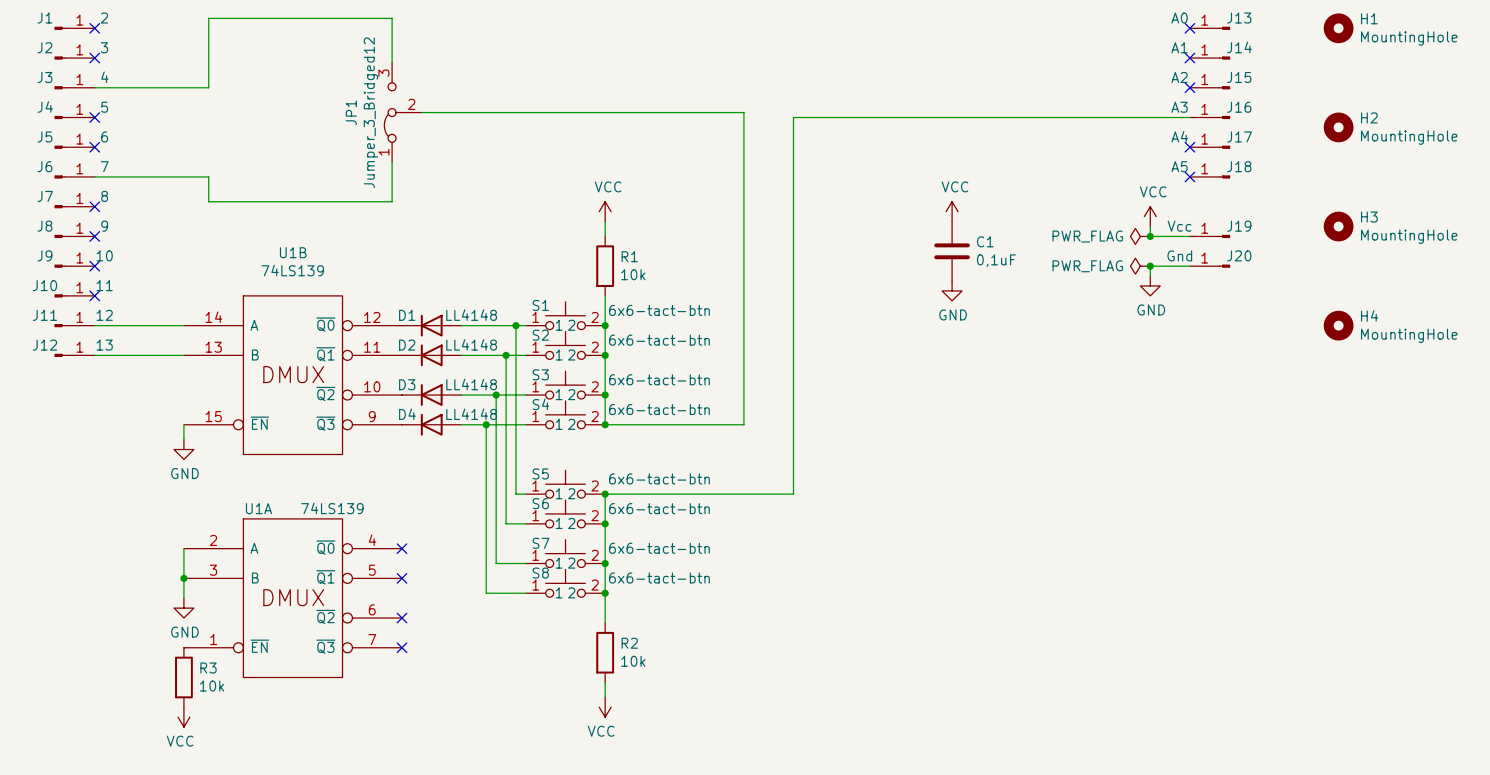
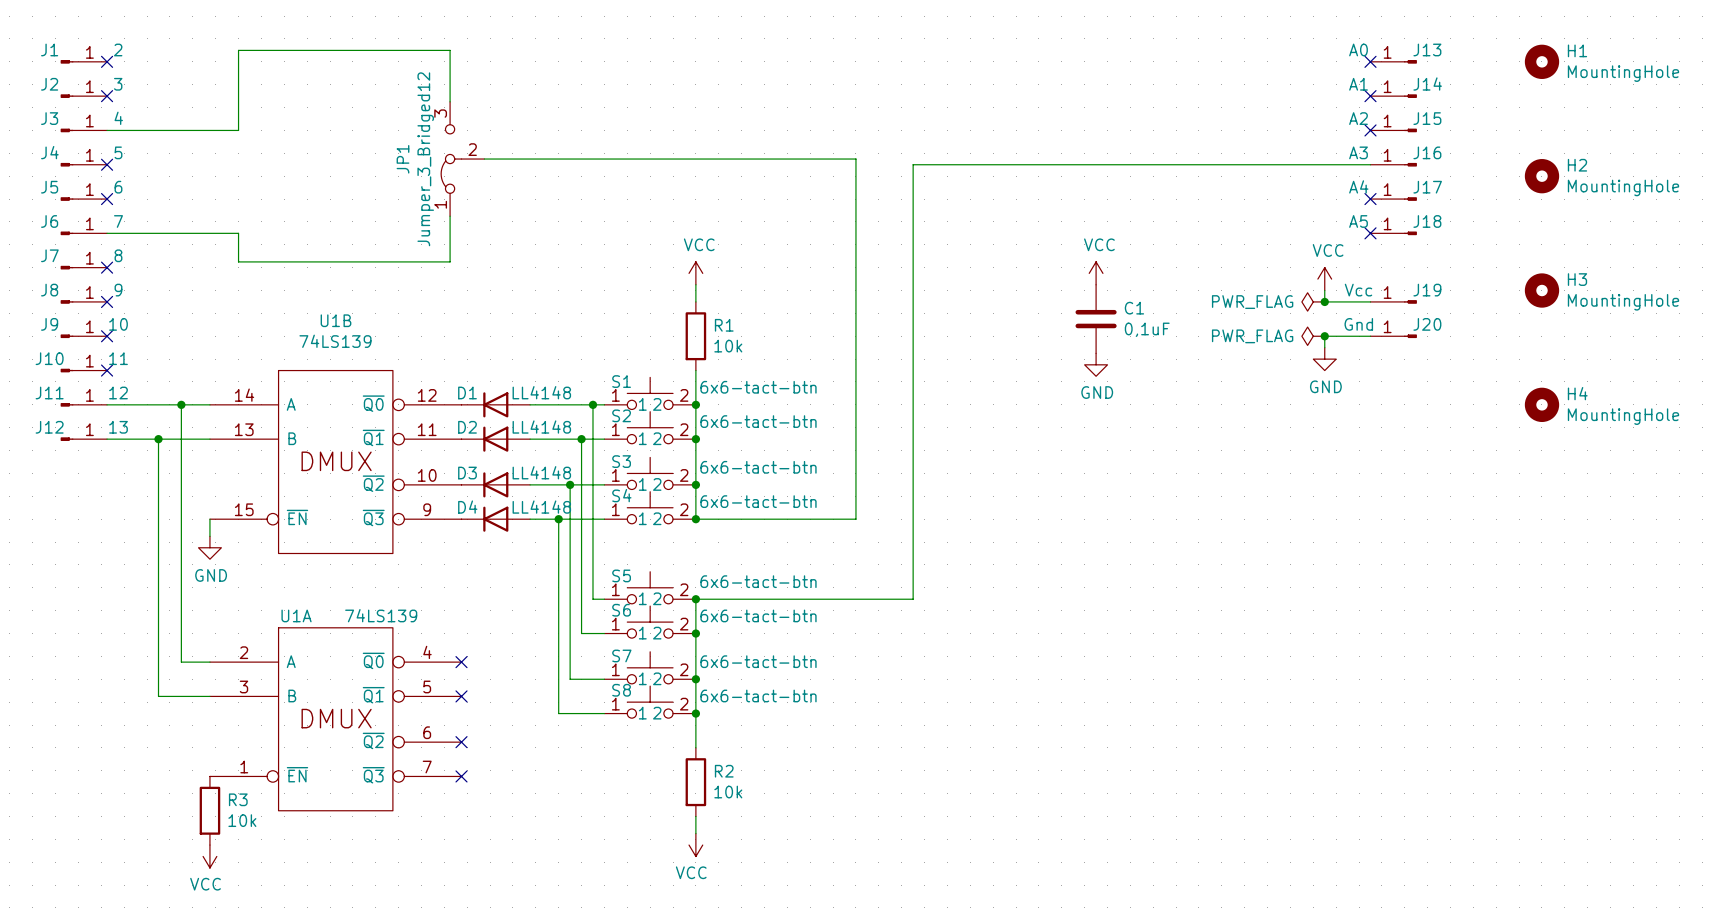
junction: none -> (181, 404)
wire: none -> (158, 439) (158, 696) (209, 696)
junction: none -> (158, 439)
wire: (183, 548) (183, 598) -> (209, 662) (181, 662) (181, 404)
junction: (183, 578) -> none
power symbol: GND (183, 608) -> none

